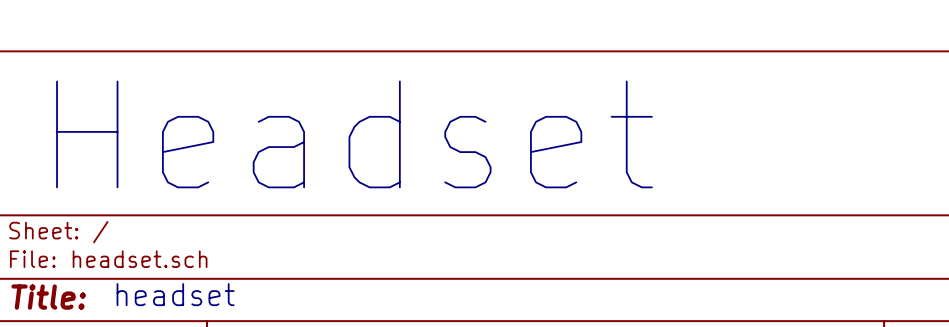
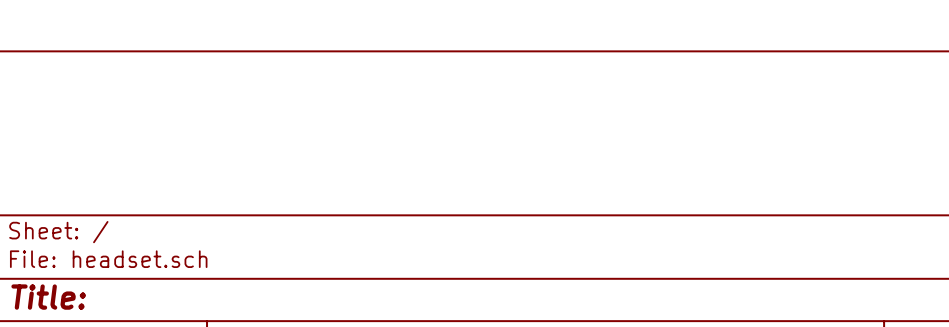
text: Headset (354, 134) -> none
text: headset (175, 294) -> none

